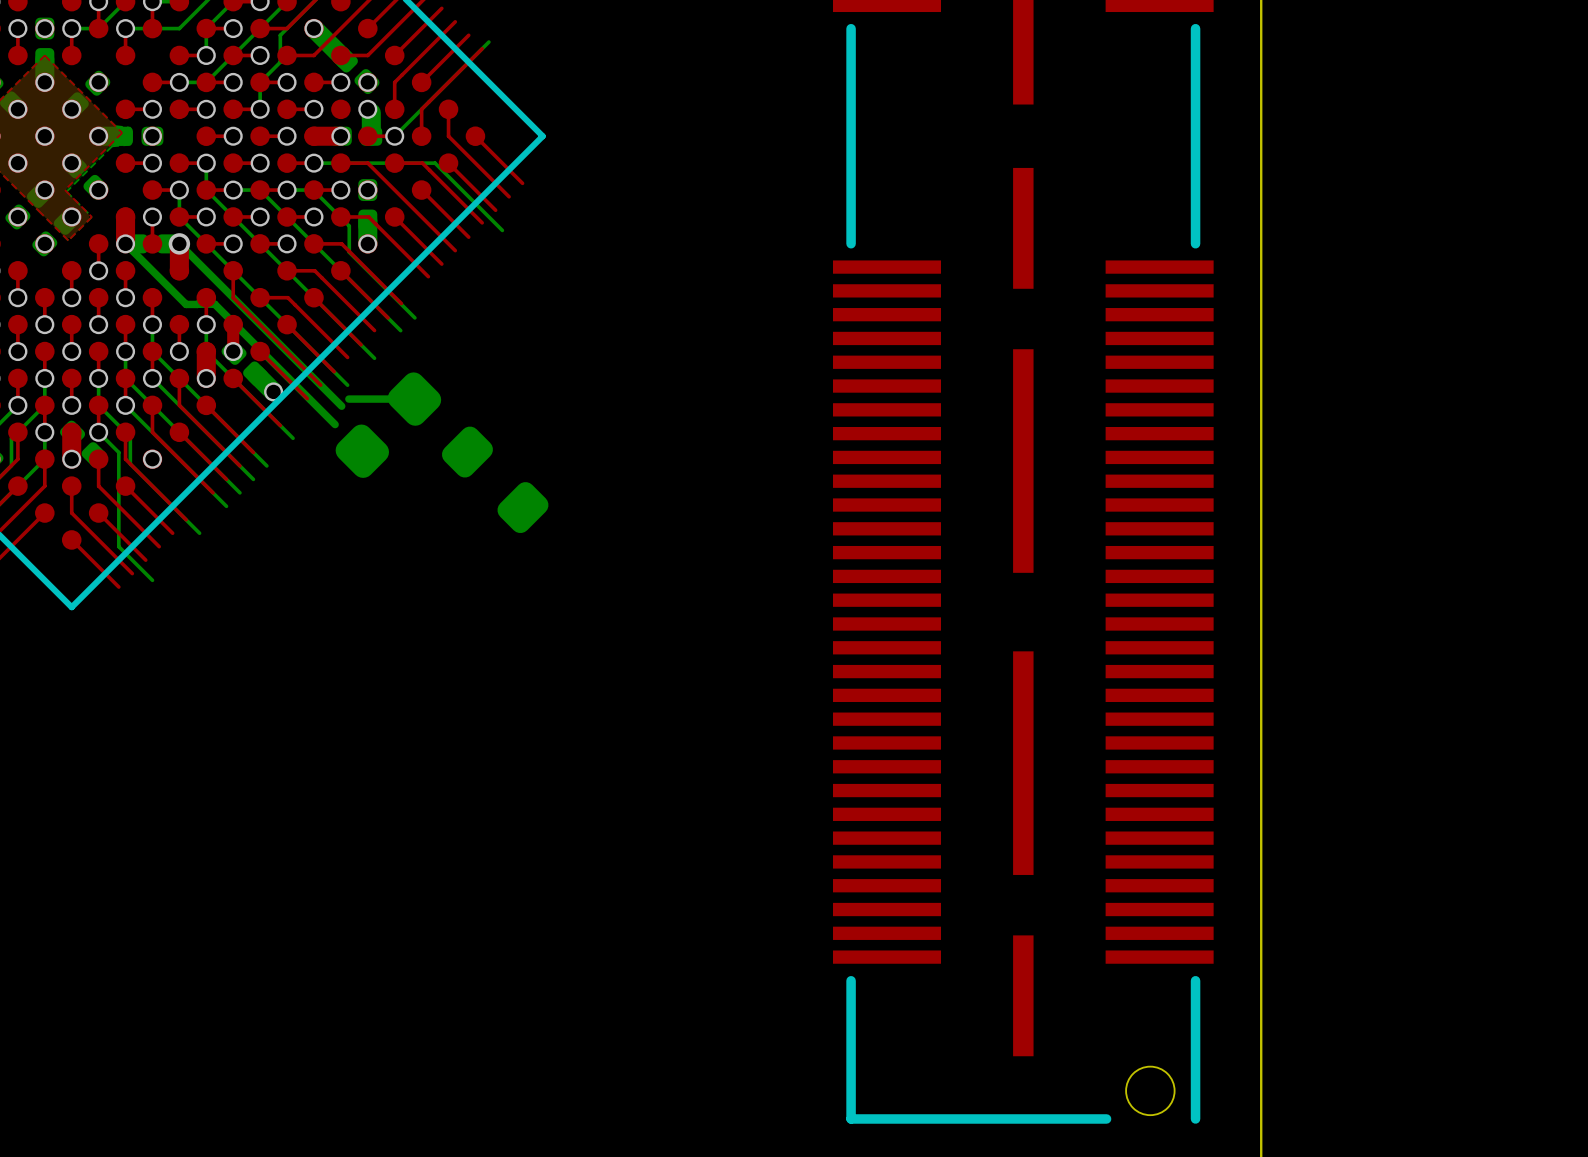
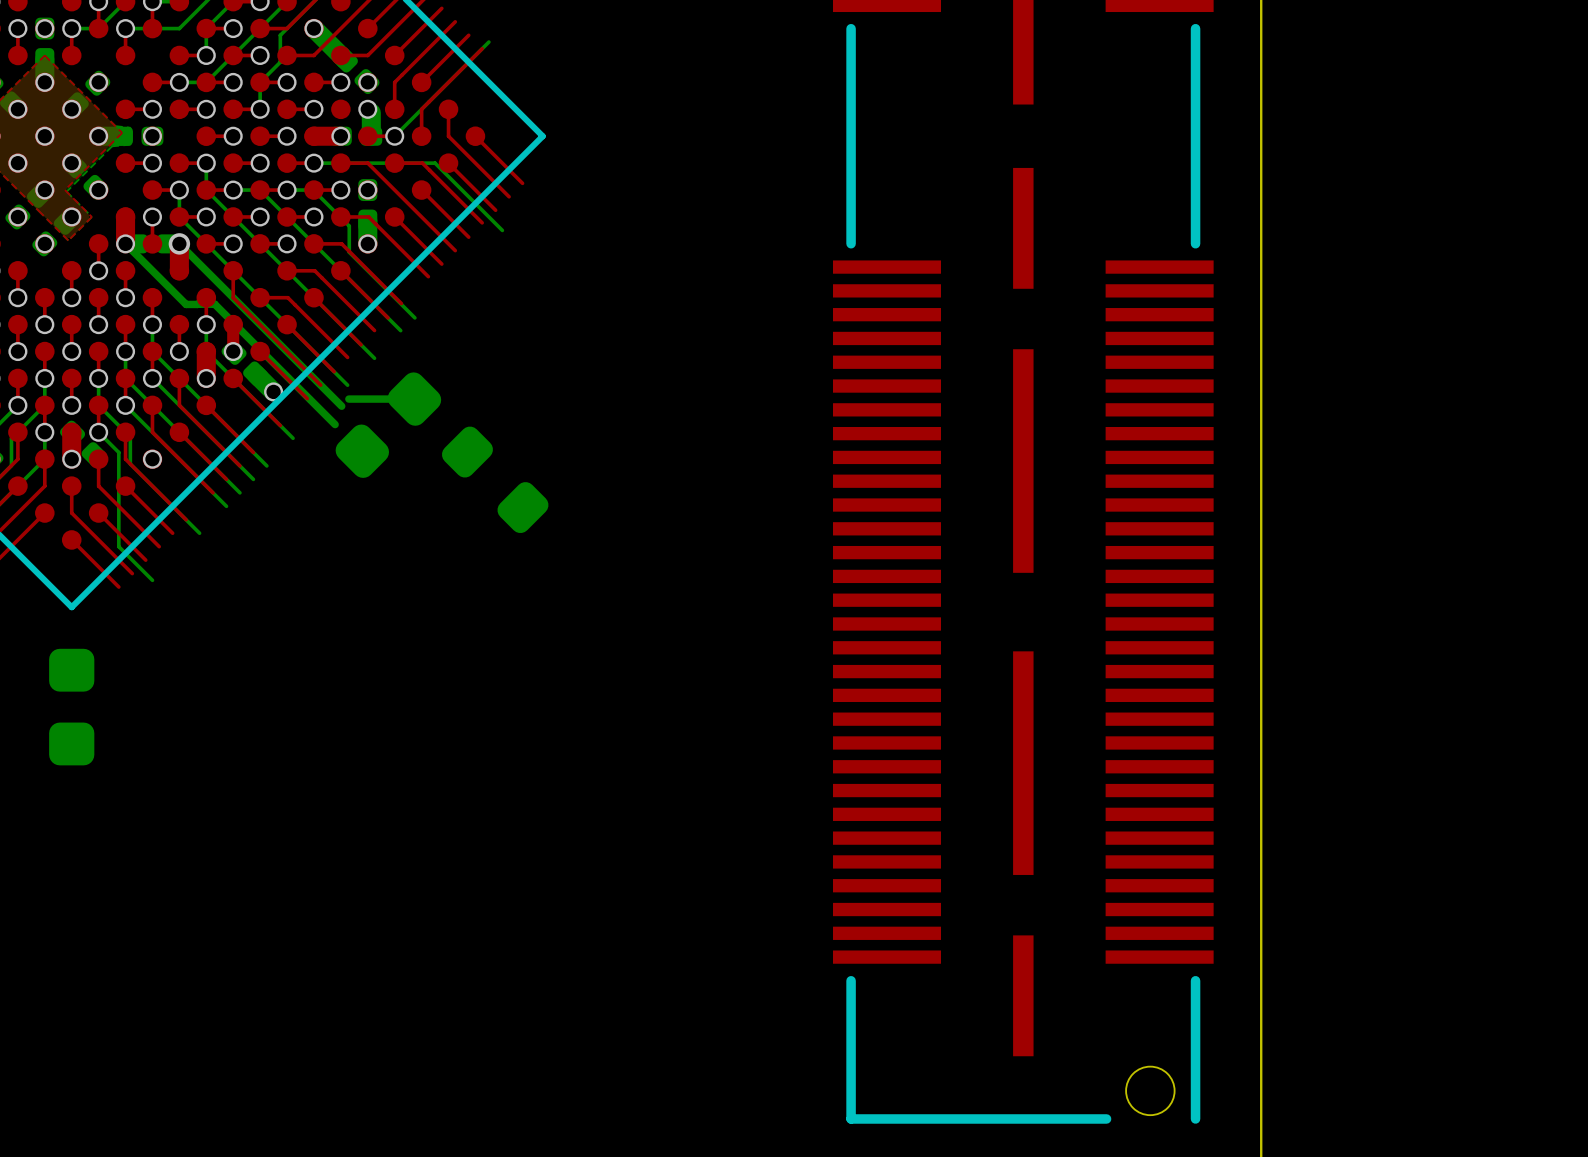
part: none -> (71, 707)

